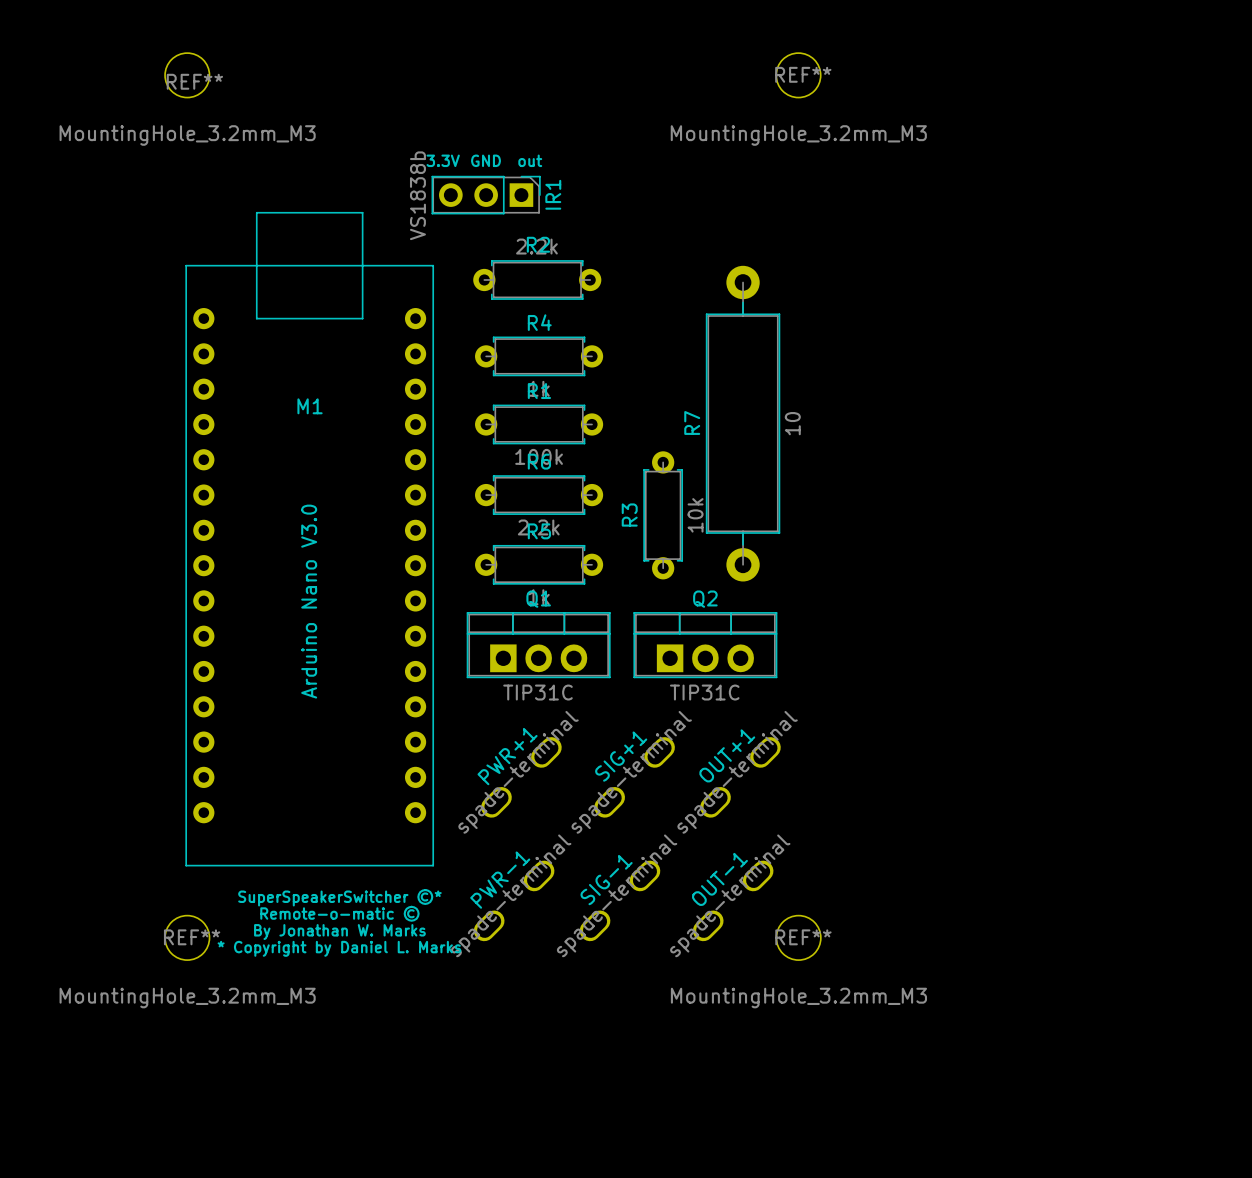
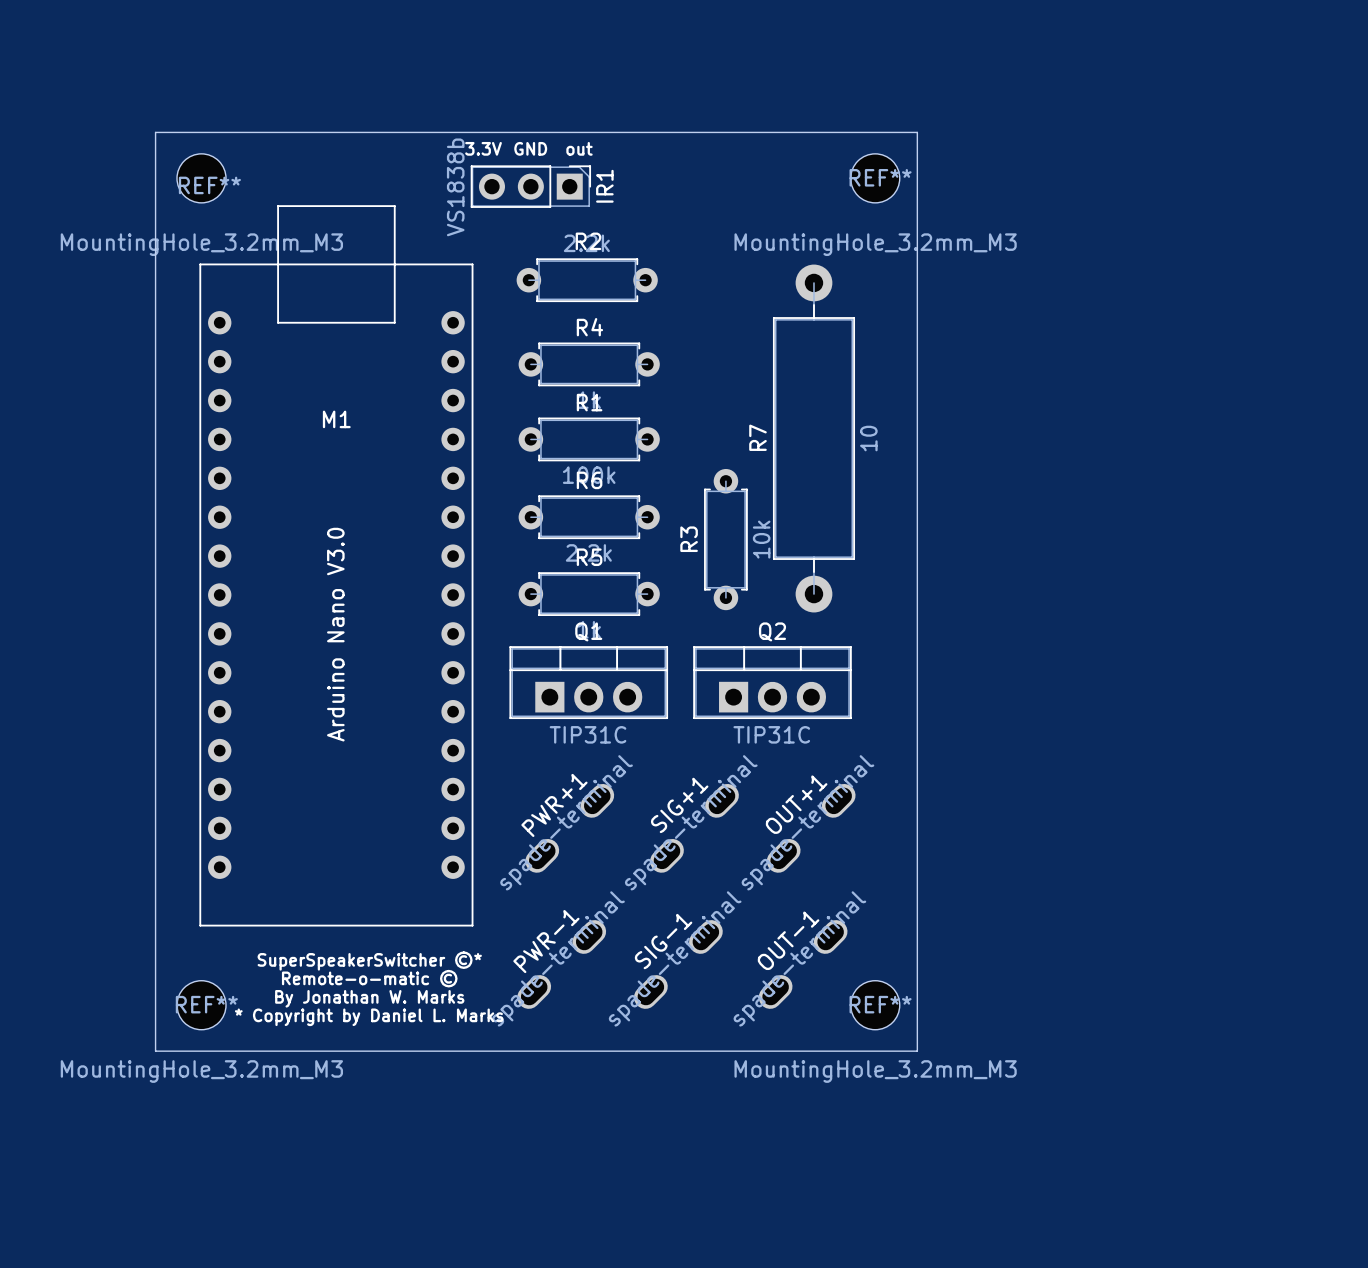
REF** position: (187, 75) -> (201, 178)
REF** position: (798, 75) -> (875, 178)
board edge: none -> (155, 132) (155, 1051) (917, 1051) (917, 132) (155, 132)

